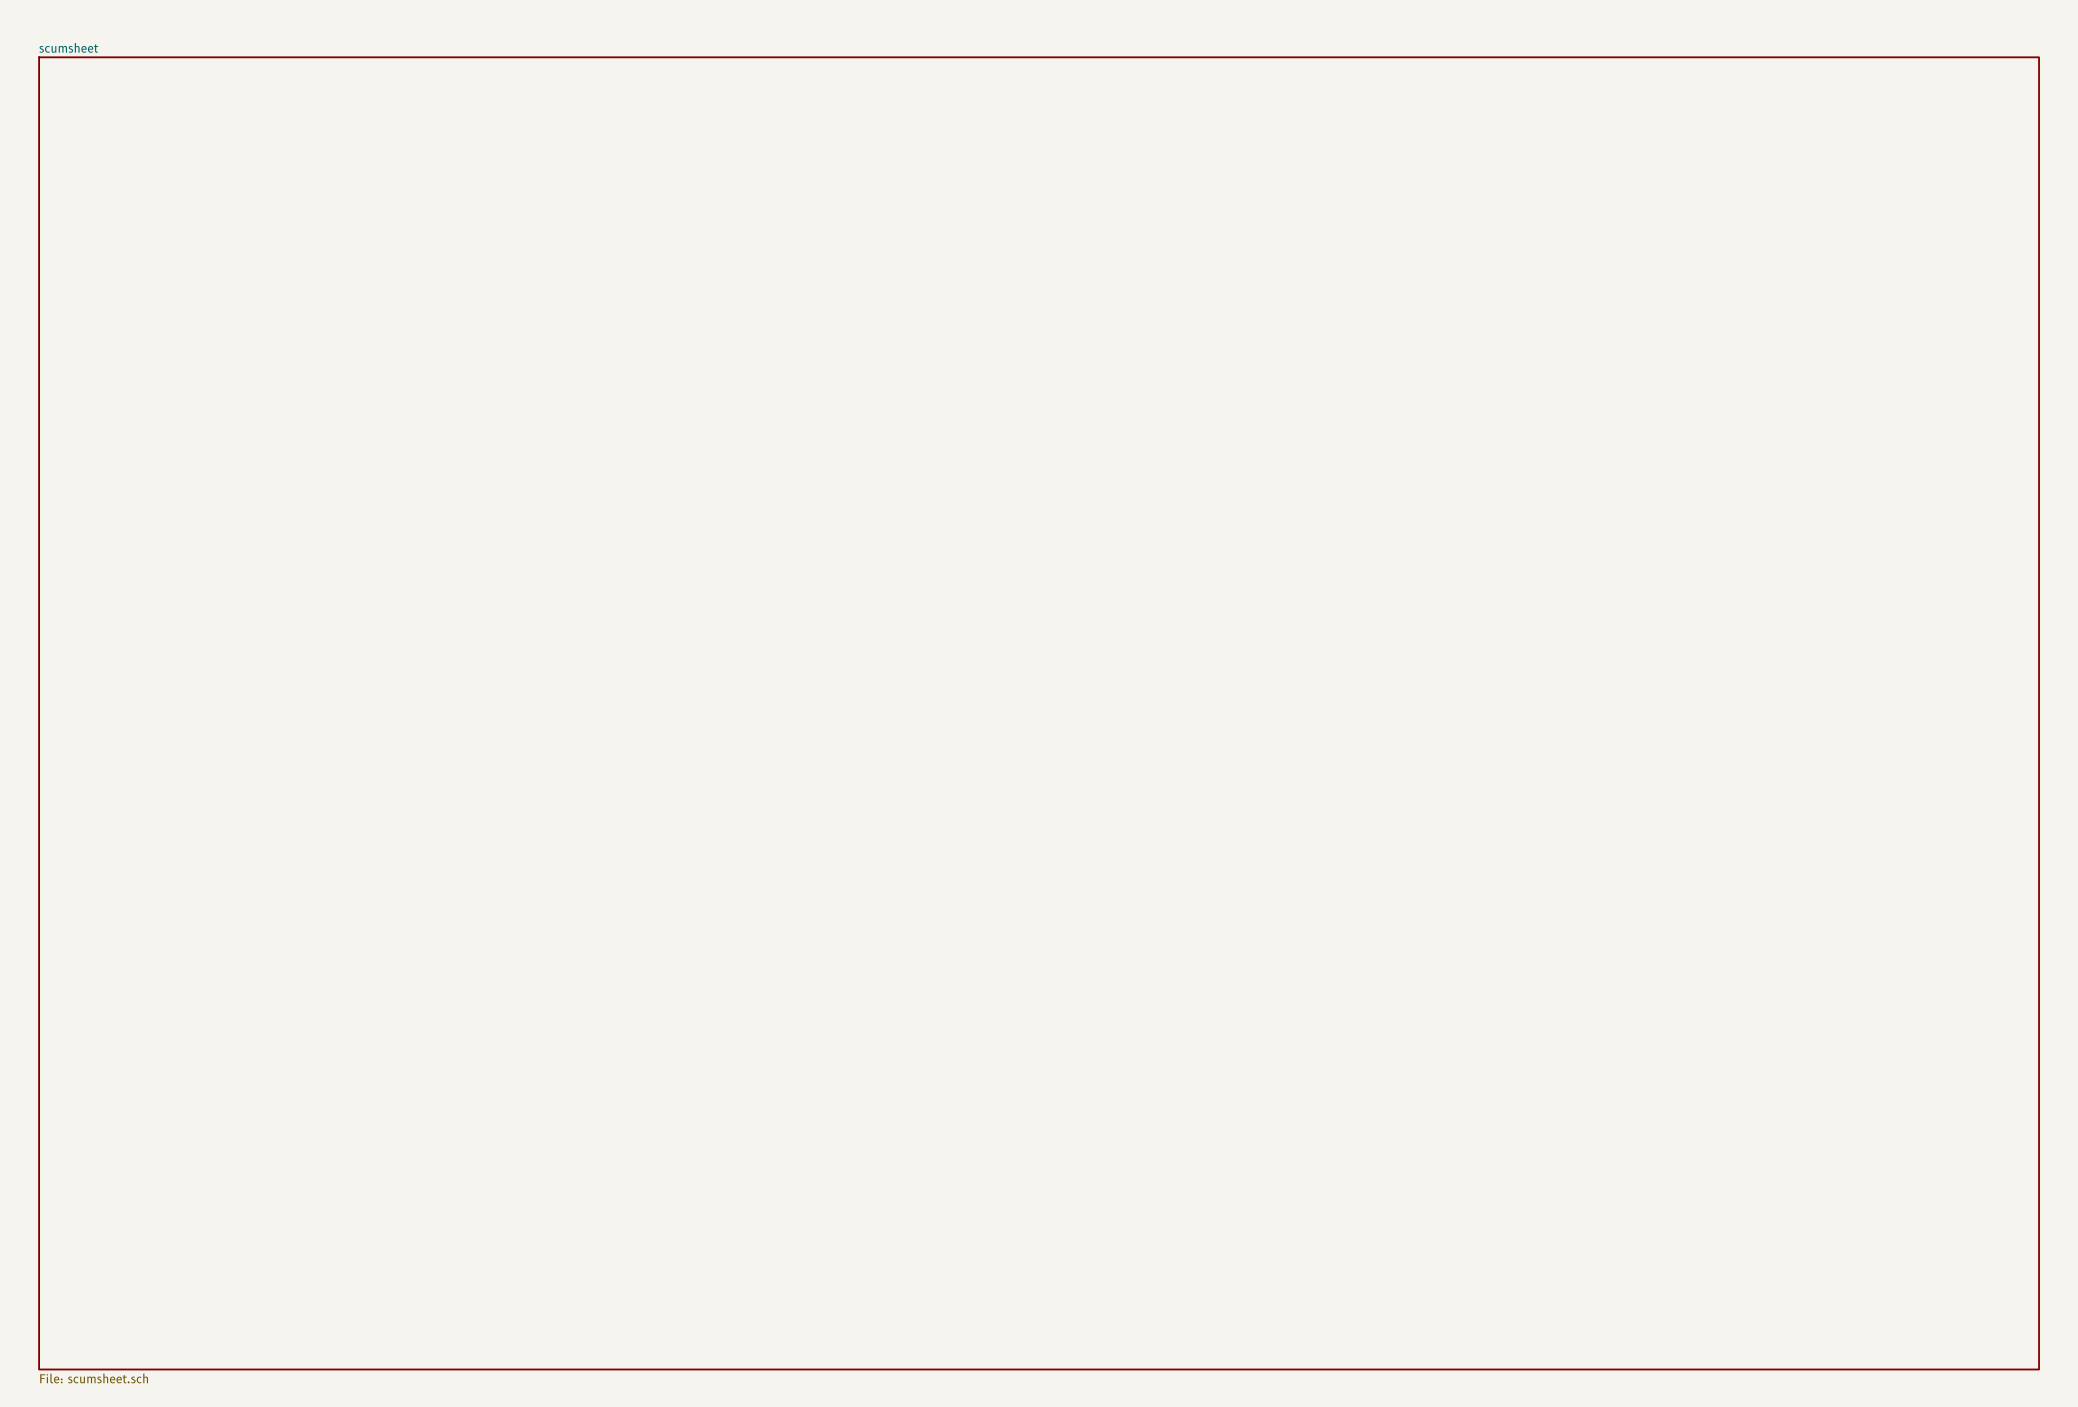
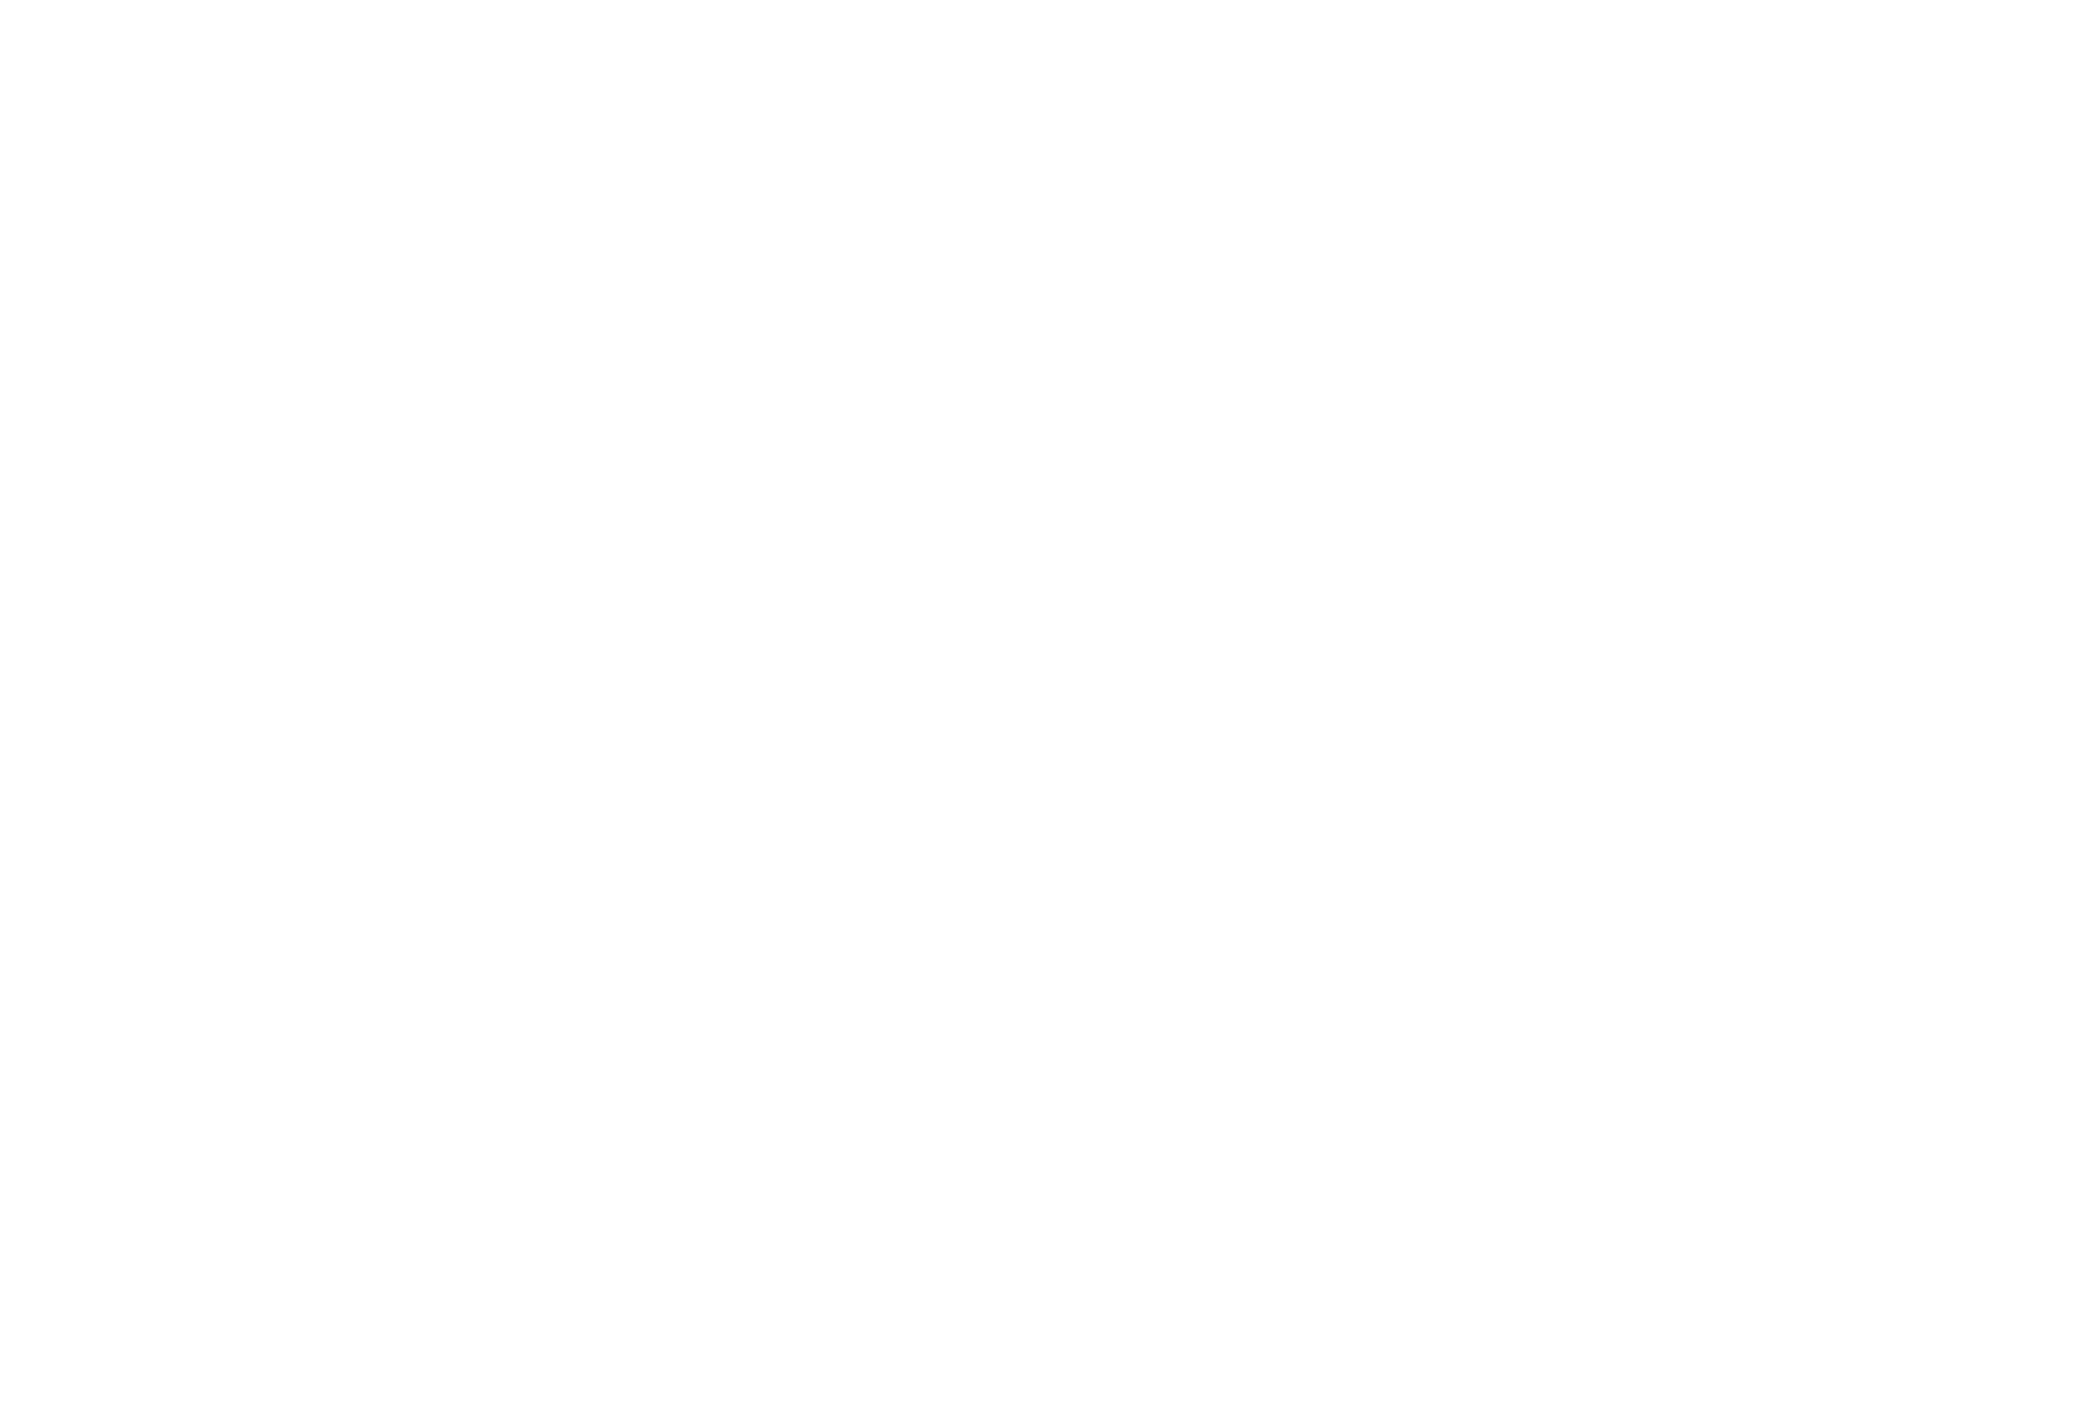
sheet scumsheet: File: scumsheet.sch (1039, 713) -> none

